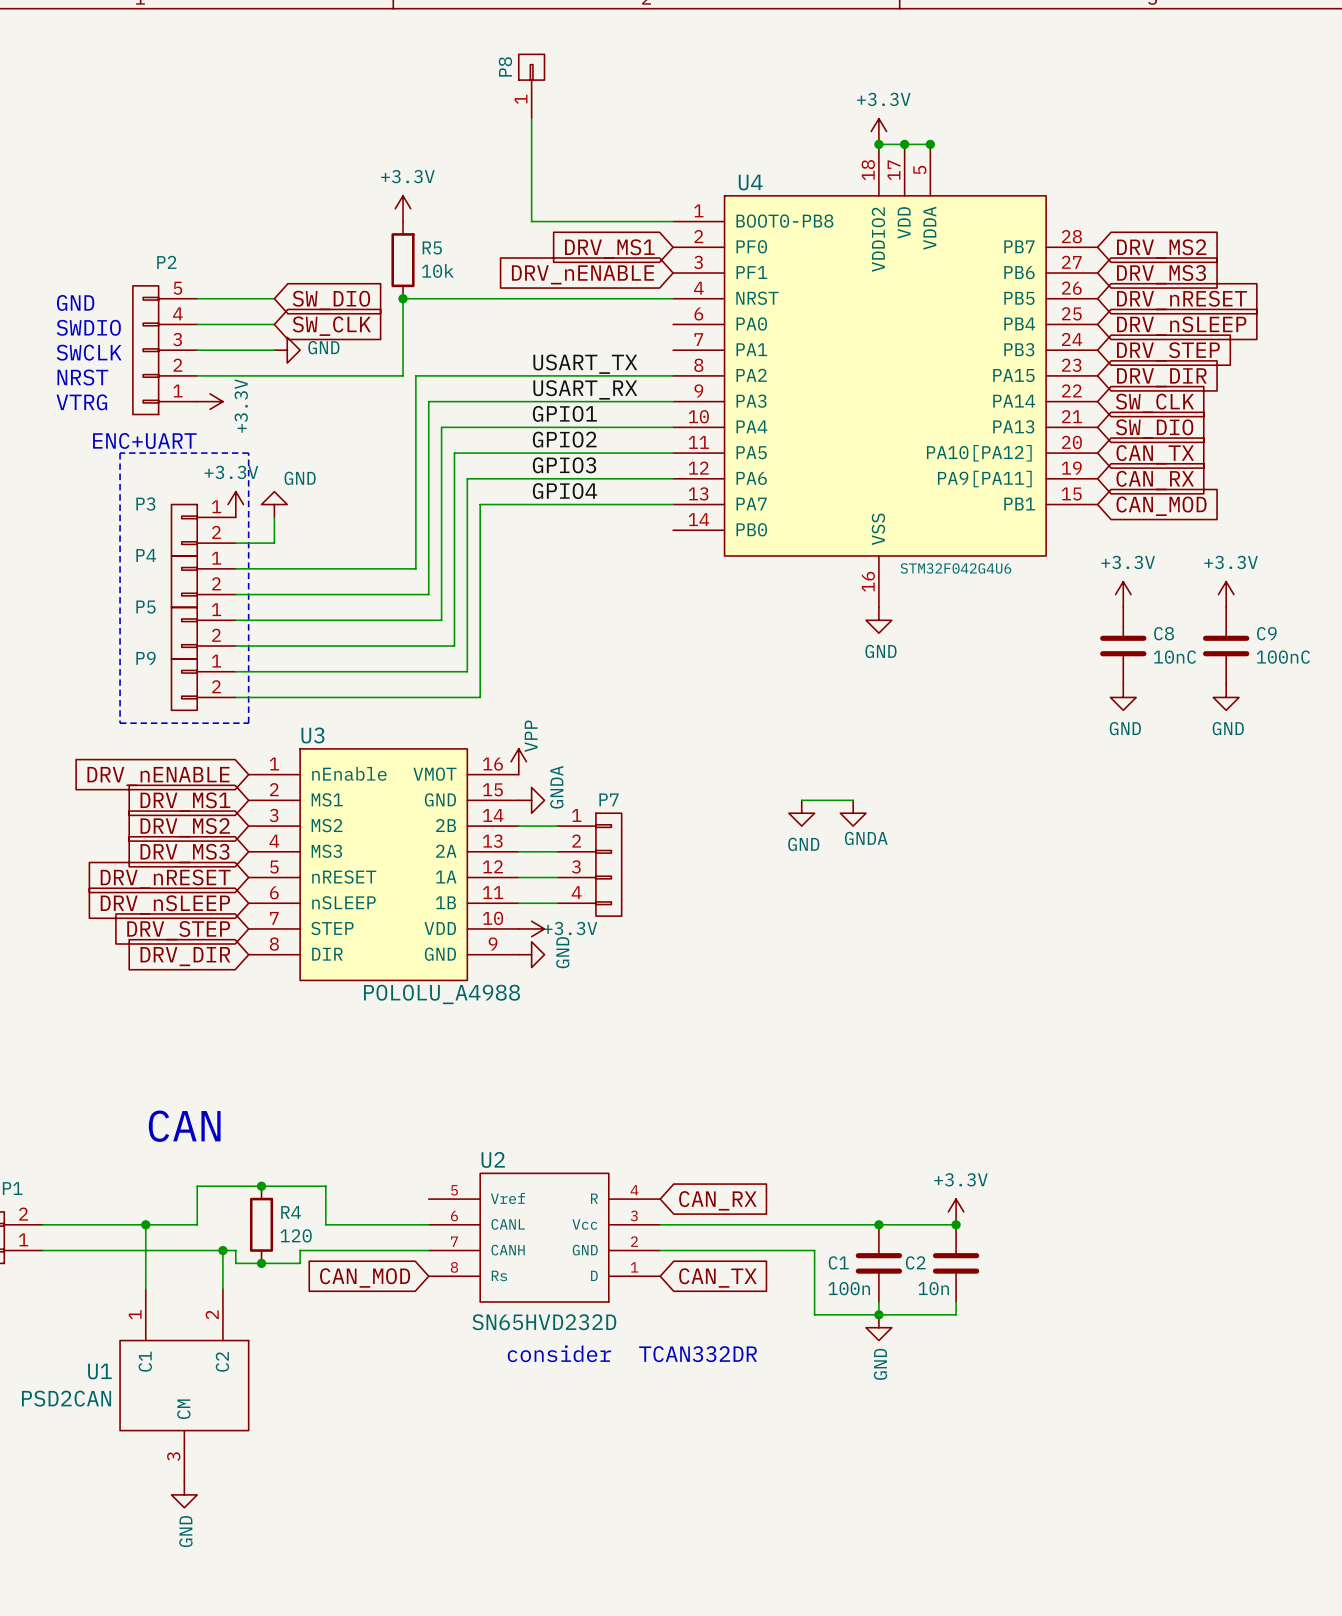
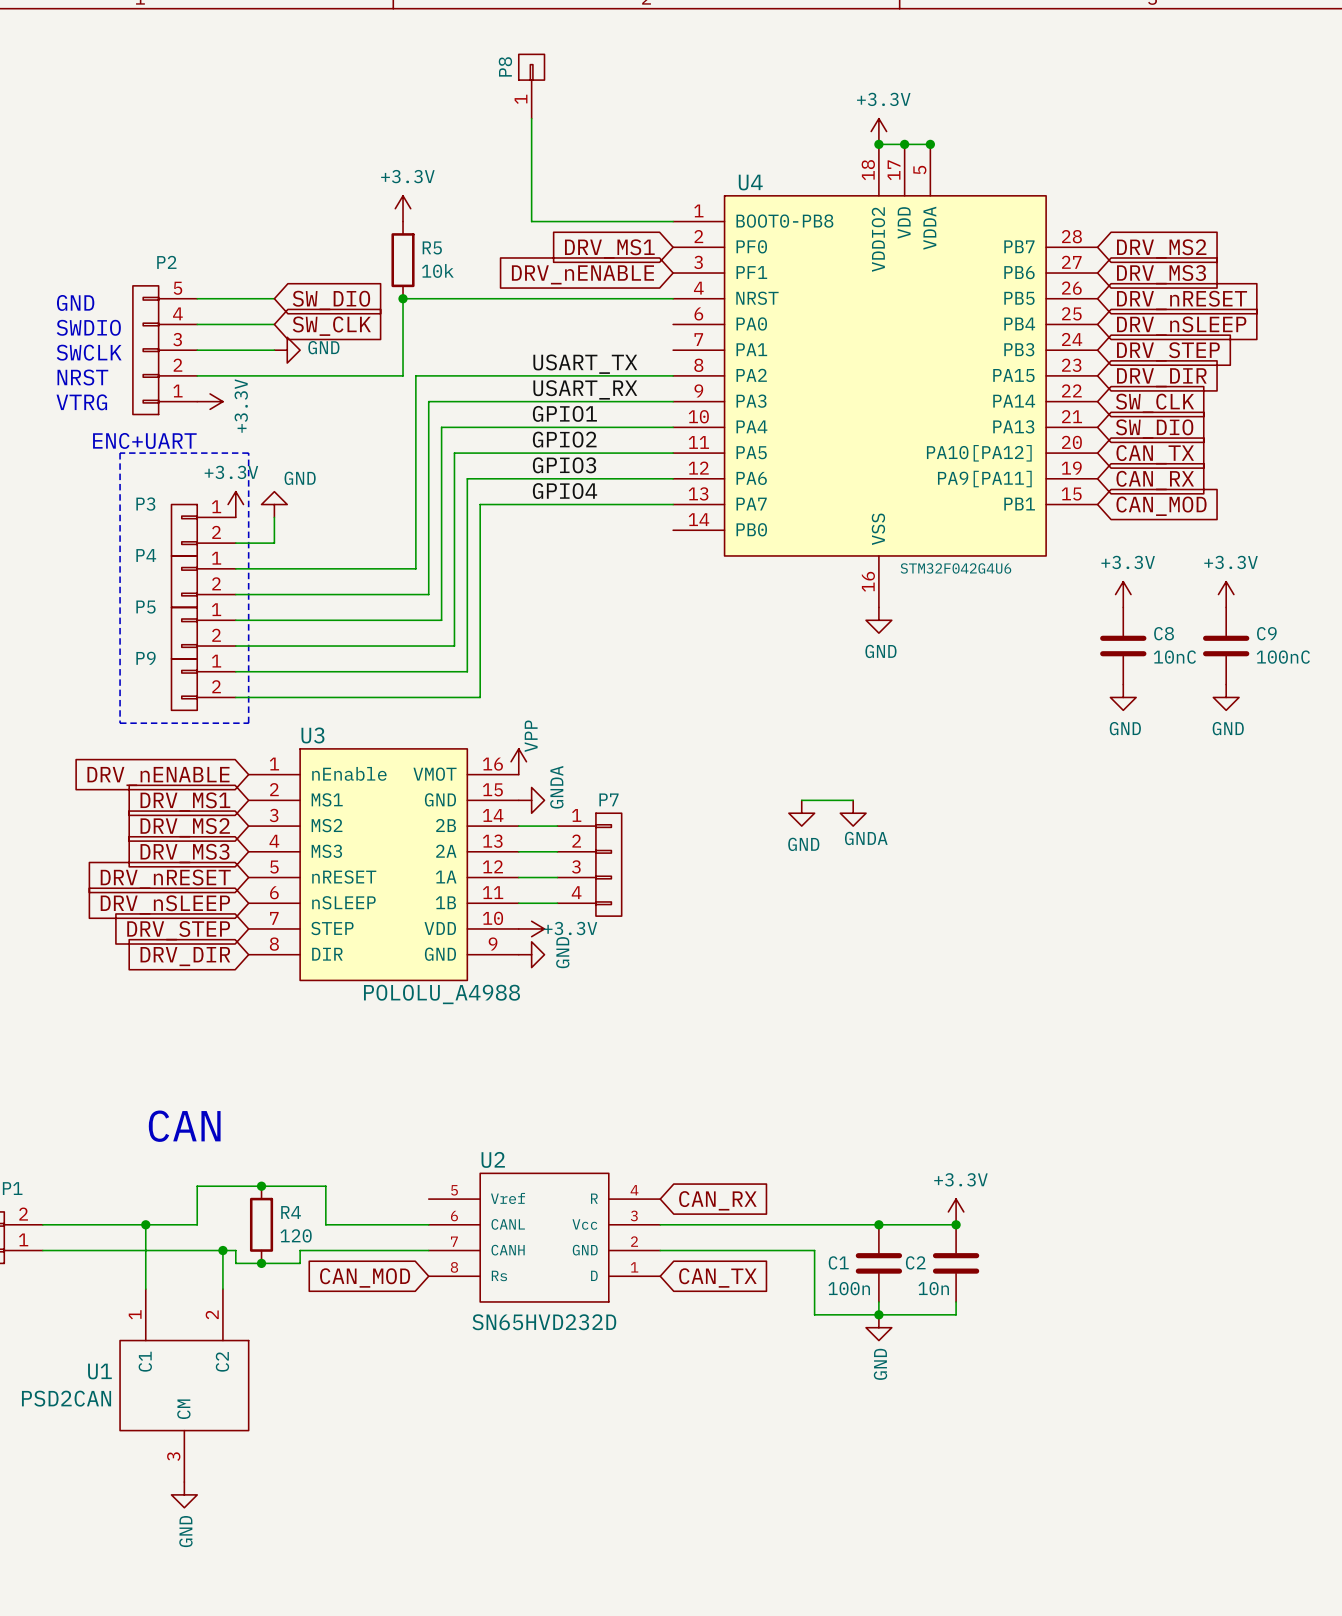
text: consider TCAN332DR (632, 1353) -> none

